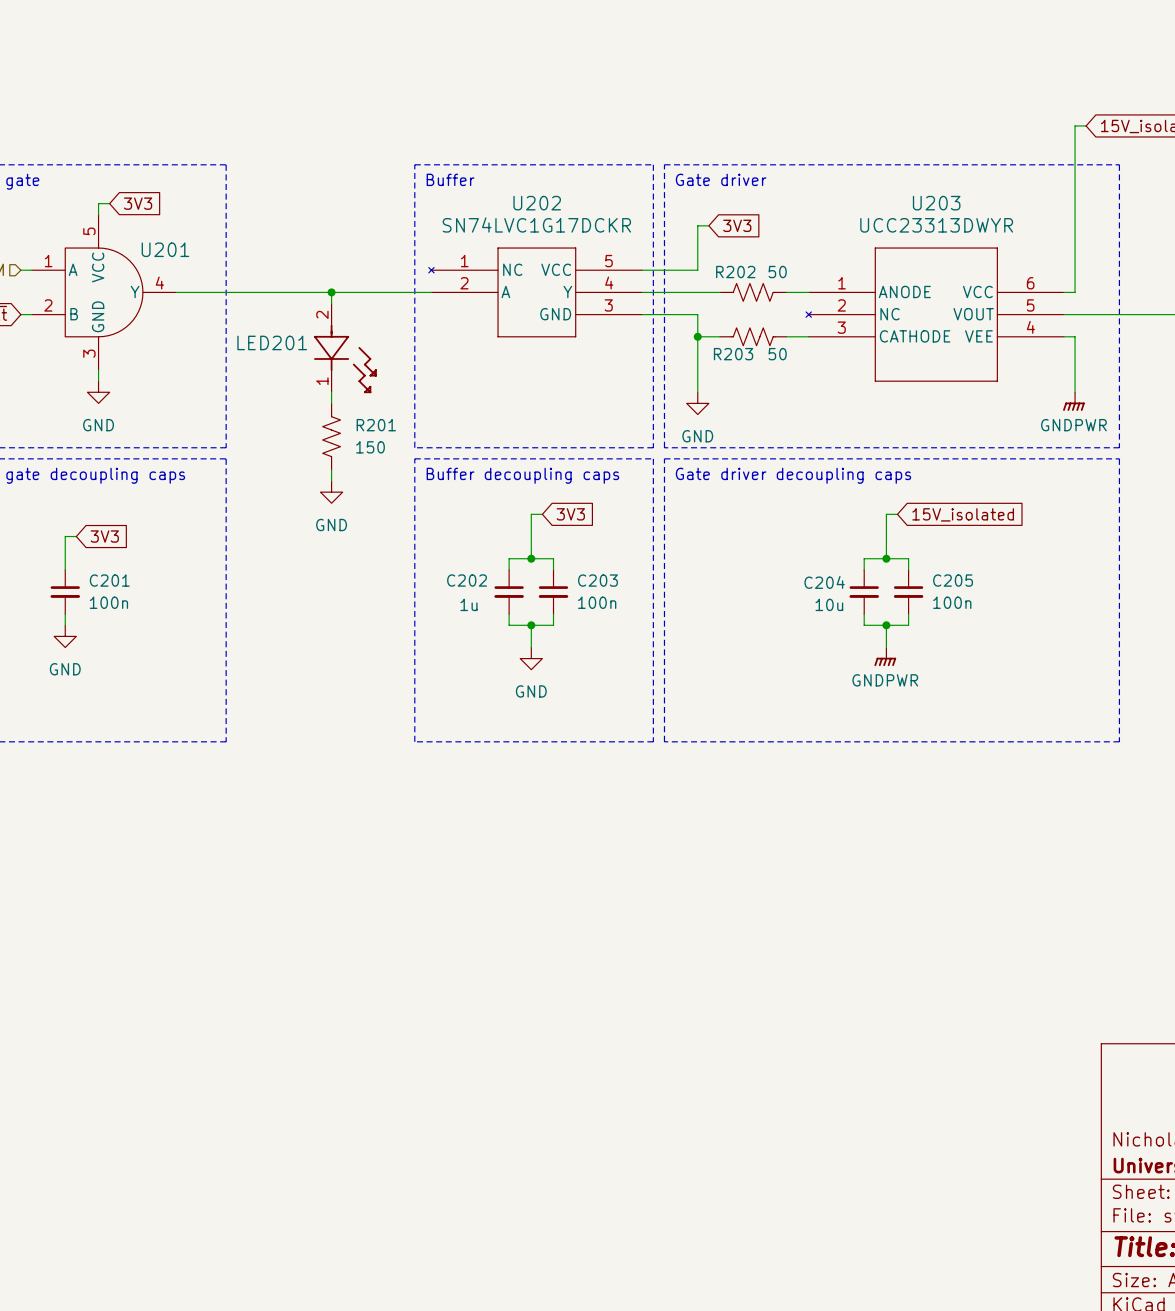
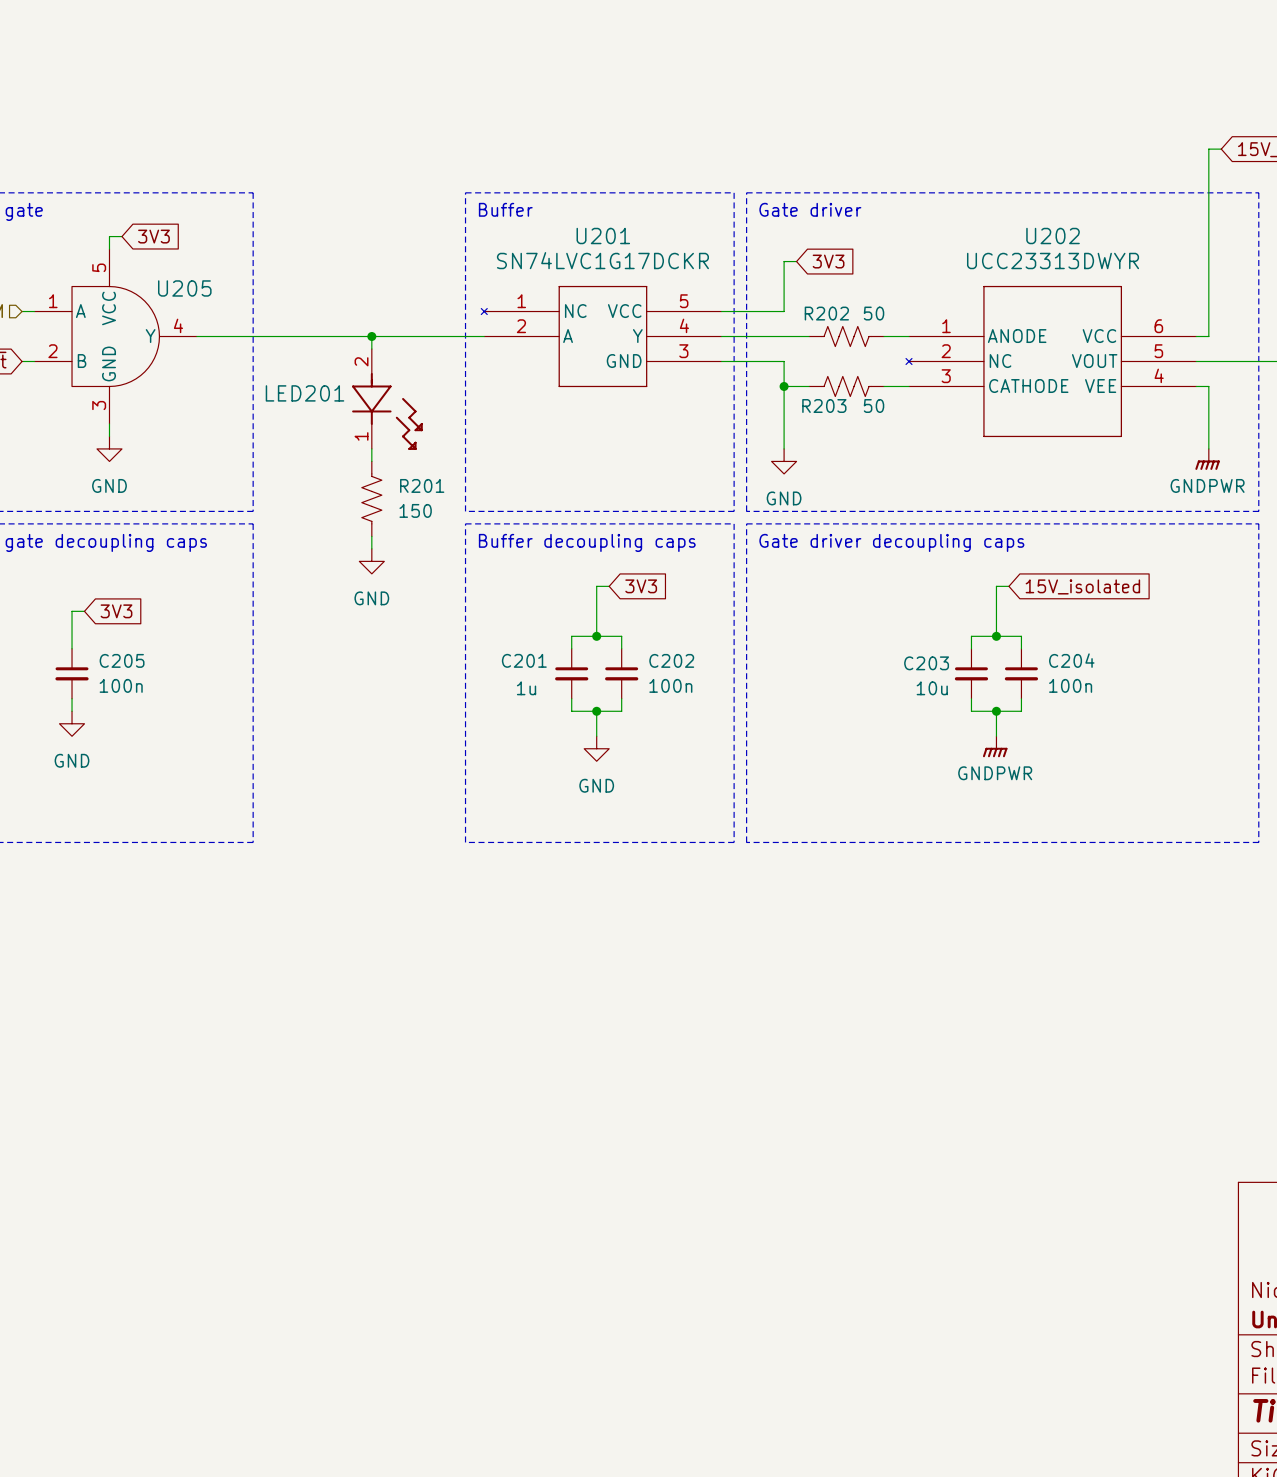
U202 name: U202 (537, 203) -> U201 (603, 236)
U203 name: U203 (936, 203) -> U202 (1053, 236)
U201 name: U201 (165, 249) -> U205 (184, 288)
C201 name: C201 (109, 580) -> C205 (122, 660)
C202 name: C202 (467, 580) -> C201 (524, 660)
C203 name: C203 (597, 580) -> C202 (671, 660)
C205 name: C205 (953, 580) -> C204 (1071, 660)
C204 name: C204 (824, 582) -> C203 (926, 663)

